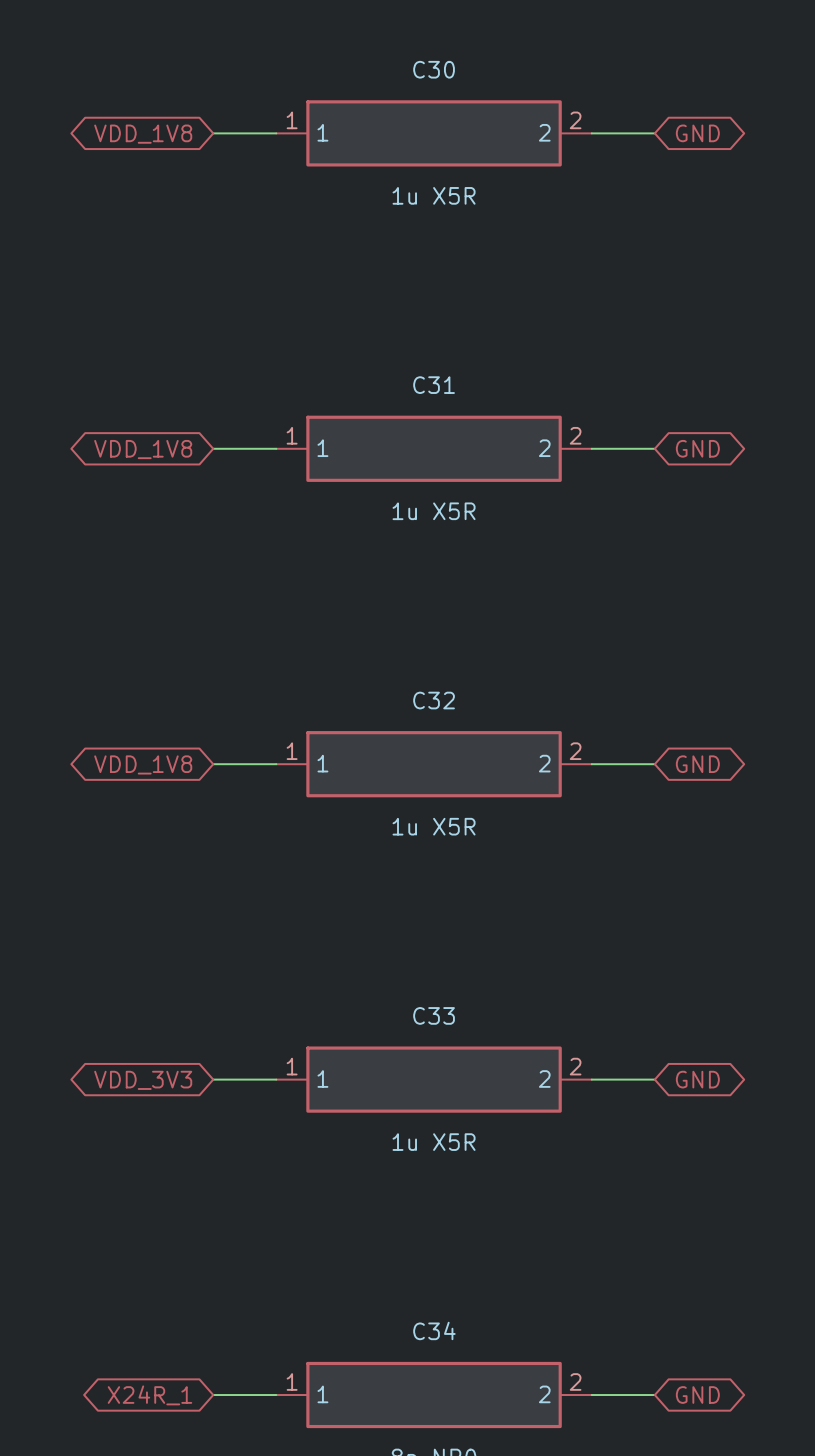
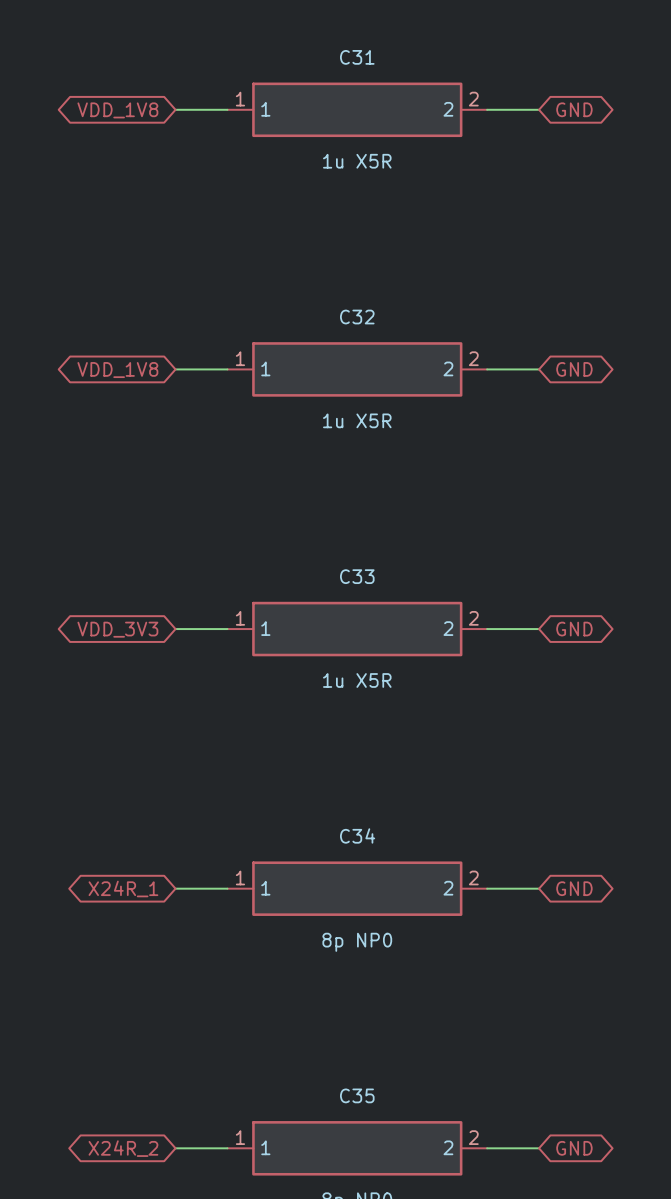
C30 name: C30 (434, 69) -> C31 (357, 57)
C31 name: C31 (434, 385) -> C32 (357, 317)
C32 name: C32 (434, 700) -> C33 (357, 576)
global label: VDD_1V8 (143, 764) -> VDD_3V3 (117, 629)
C33 name: C33 (434, 1015) -> C34 (357, 835)
global label: VDD_3V3 (143, 1080) -> X24R_1 (123, 888)
C33 value: 1u X5R (434, 1142) -> 8p NP0 (357, 942)
C34 name: C34 (434, 1330) -> C35 (357, 1095)
global label: X24R_1 (149, 1395) -> X24R_2 (123, 1148)

